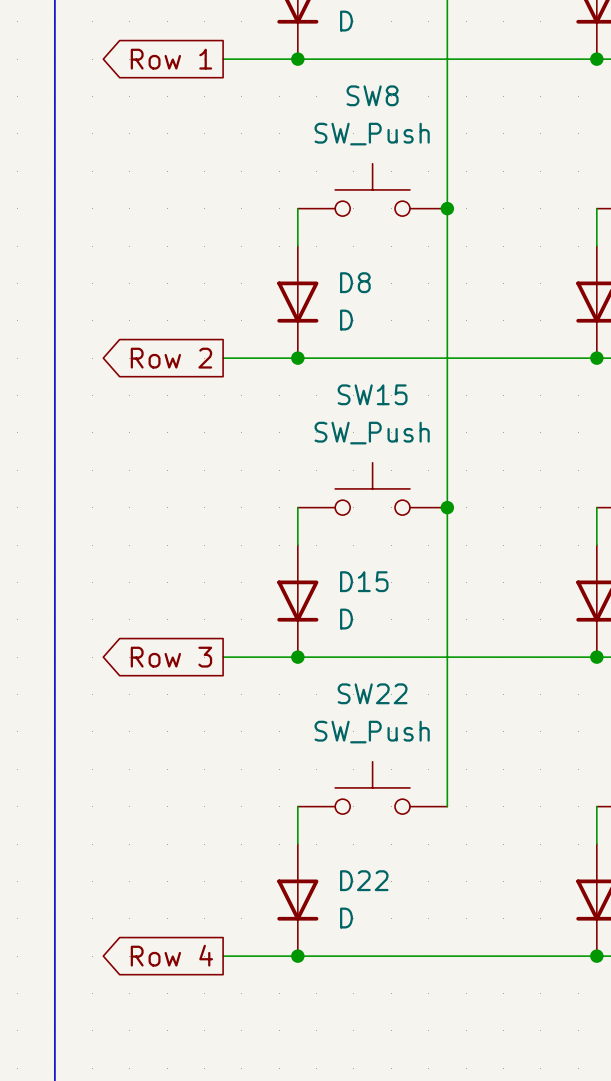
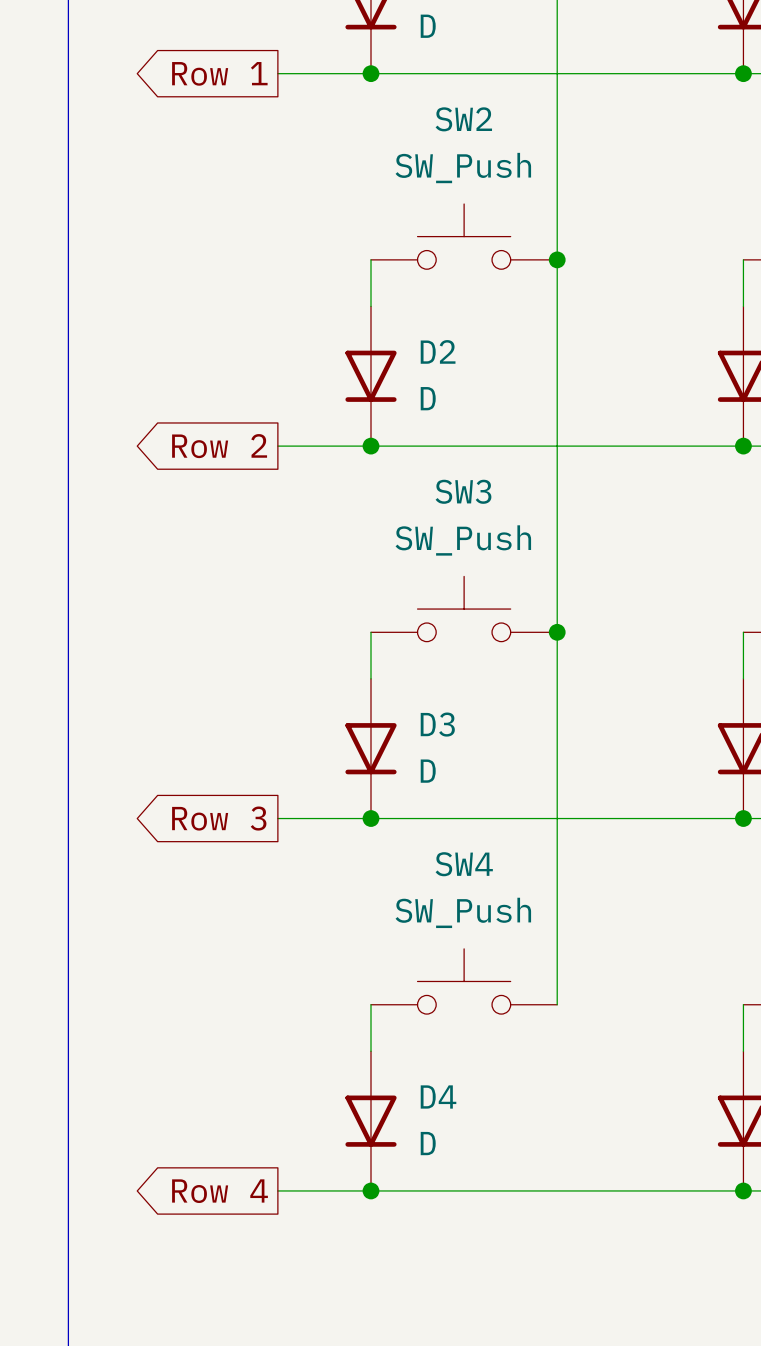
SW8 name: SW8 (372, 95) -> SW2 (463, 119)
D8 name: D8 (355, 282) -> D2 (438, 351)
SW15 name: SW15 (372, 394) -> SW3 (463, 491)
D15 name: D15 (364, 581) -> D3 (437, 724)
SW22 name: SW22 (372, 693) -> SW4 (464, 864)
D22 name: D22 (364, 880) -> D4 (438, 1096)

